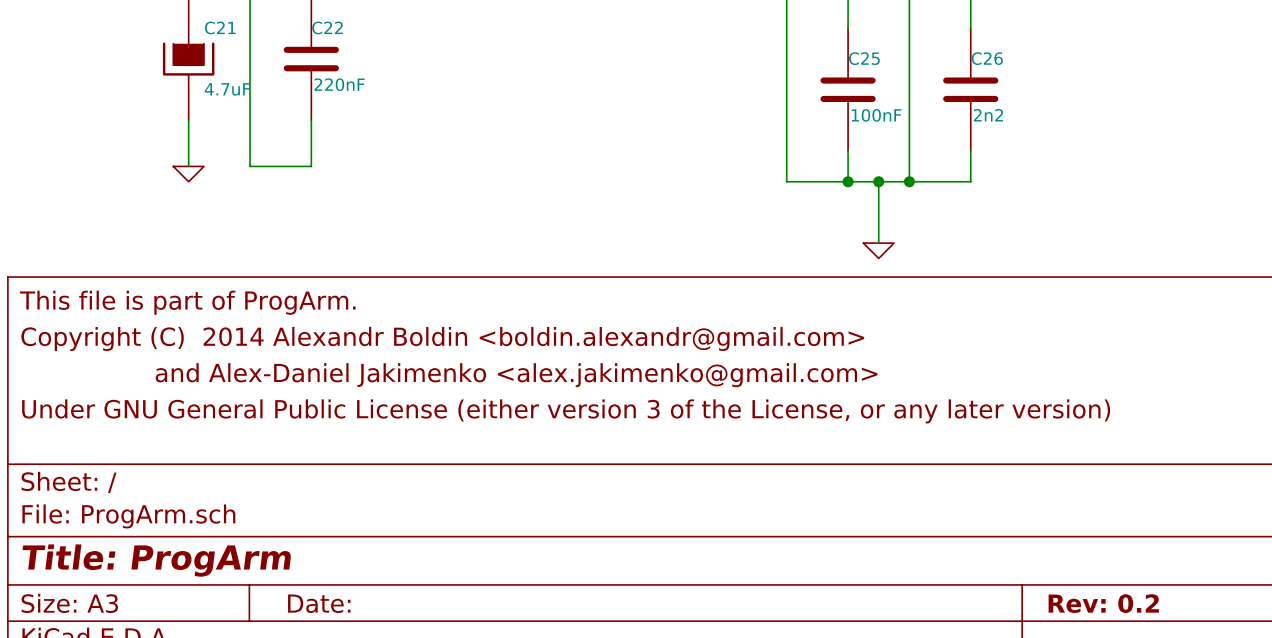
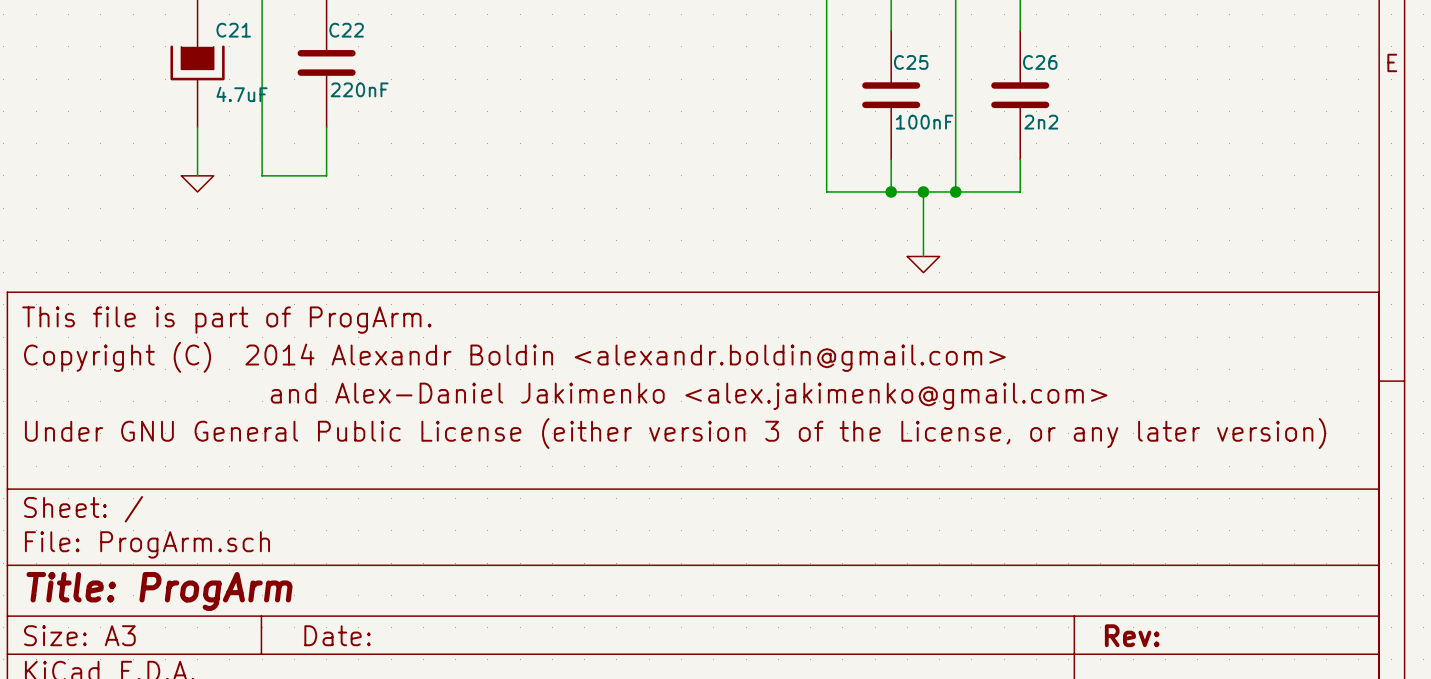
title block: Copyright (C) 2014 Alexandr Boldin <boldin.alexandr@gmail.com> (442, 338) -> Copyright (C) 2014 Alexandr Boldin <alexandr.boldin@gmail.com> (514, 357)
title block: Rev: 0.2 (1103, 603) -> Rev: (1132, 635)

